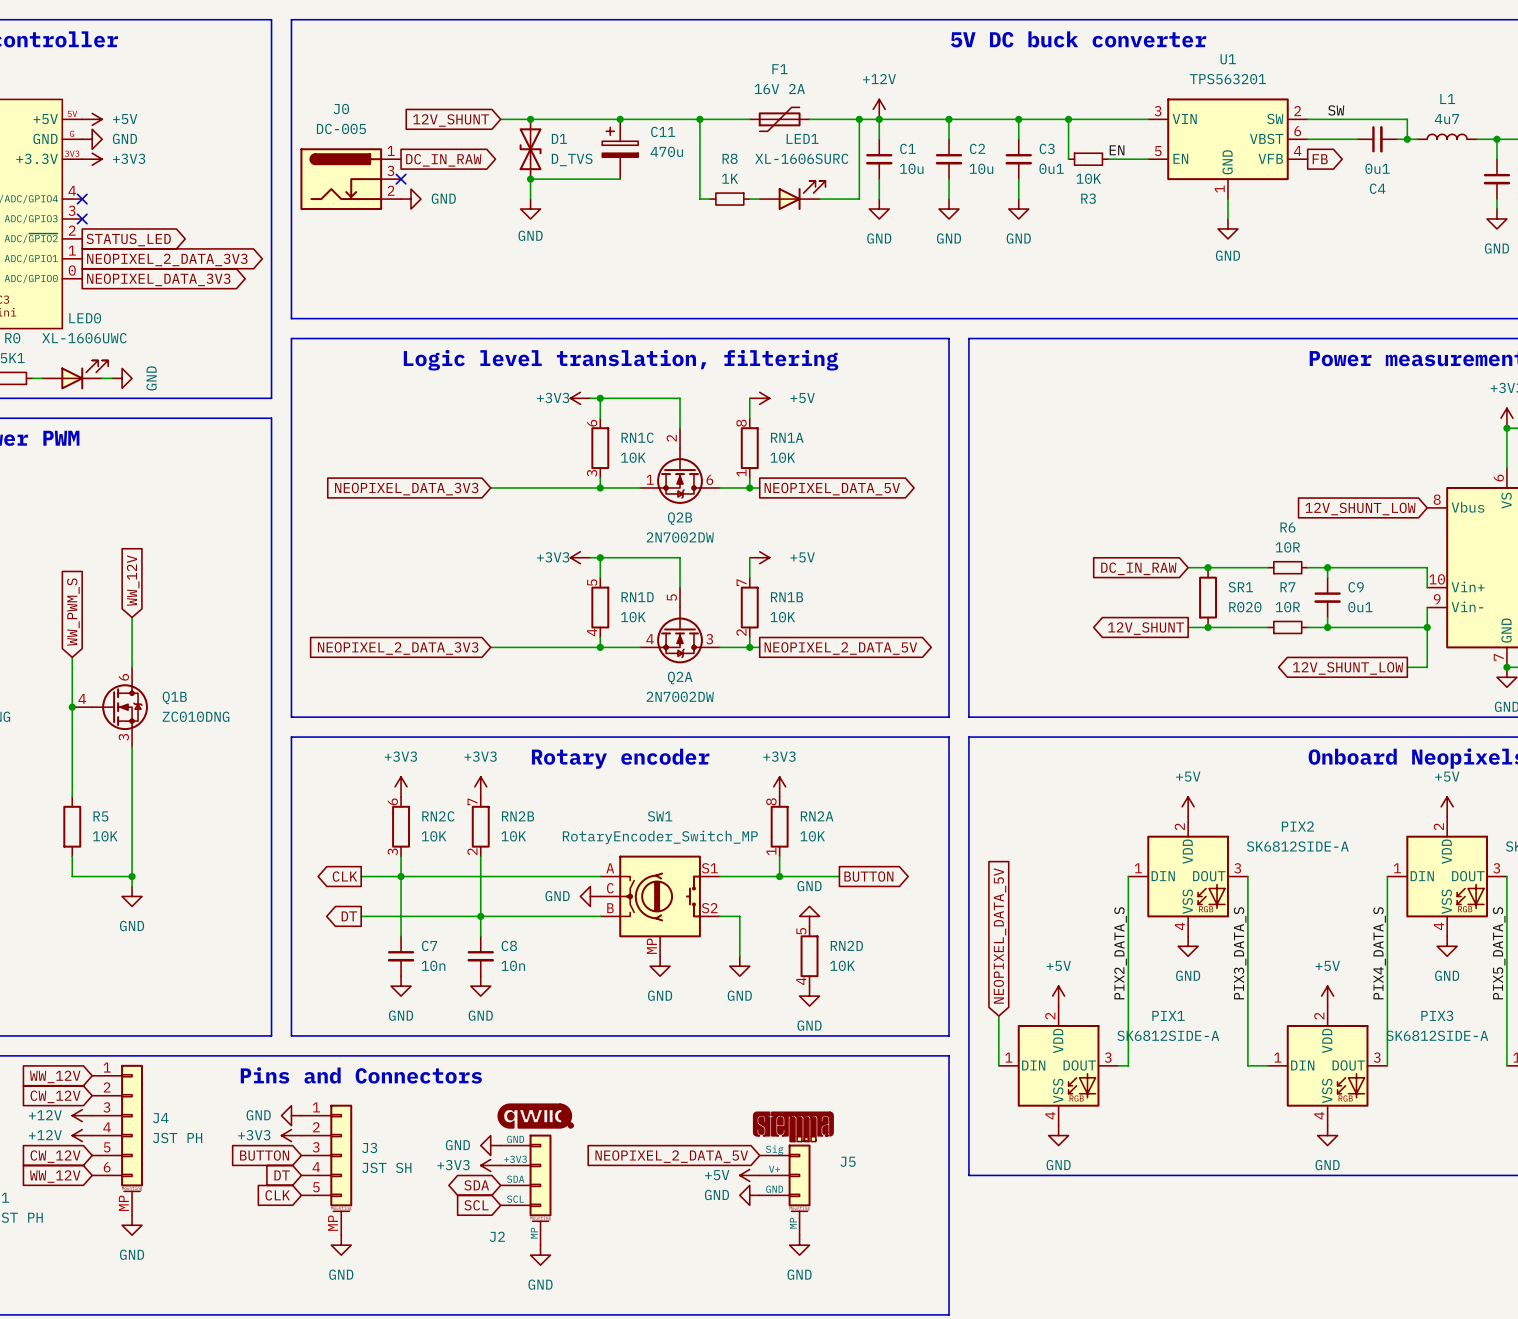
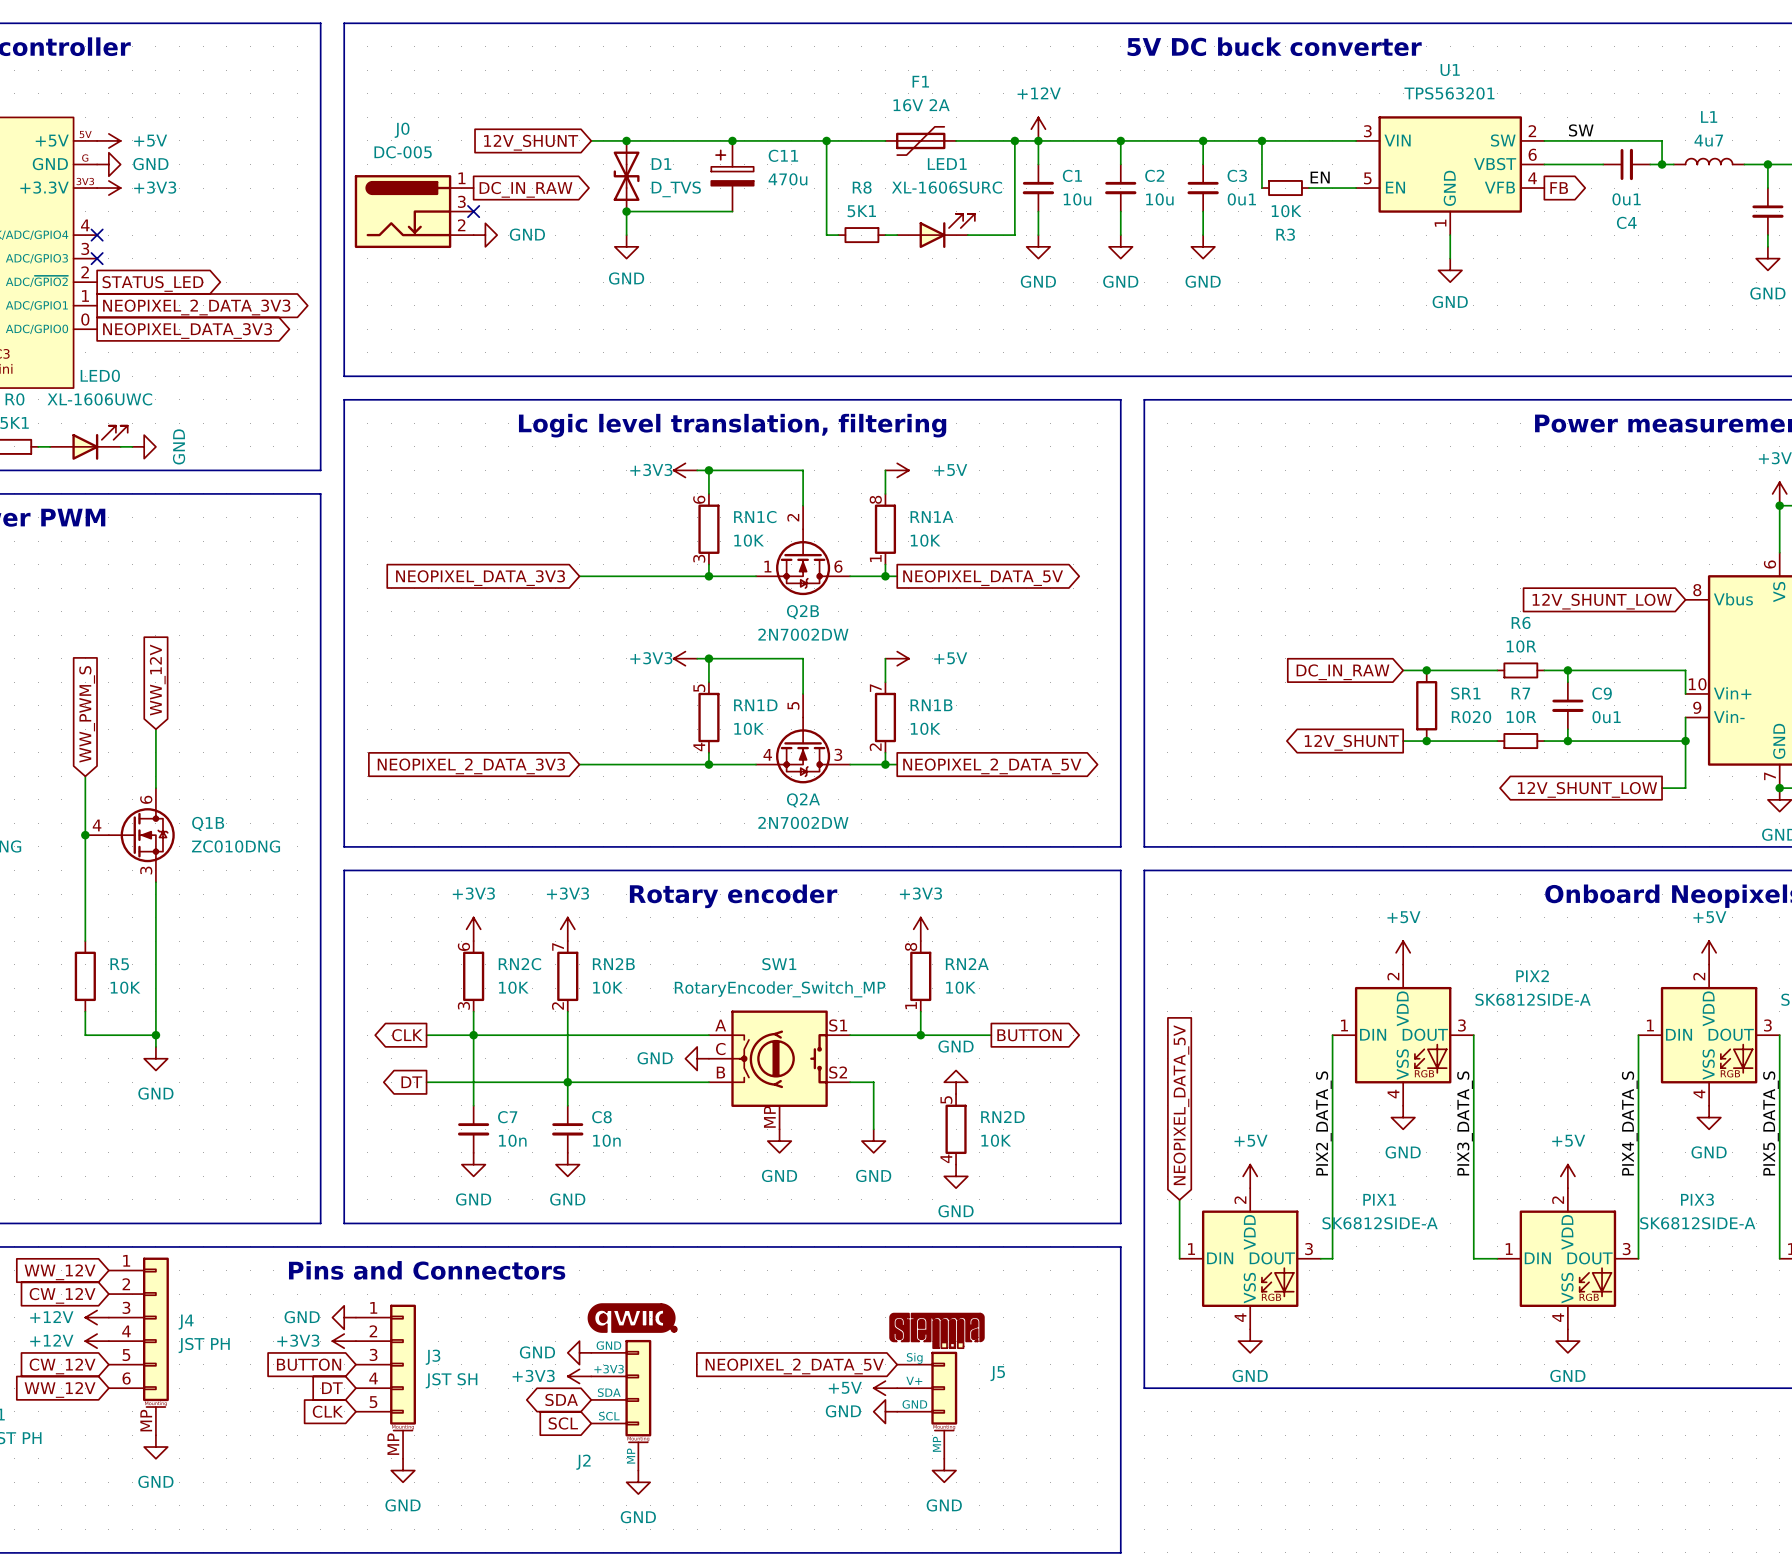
R8 value: 1K (730, 178) -> 5K1 (861, 211)

